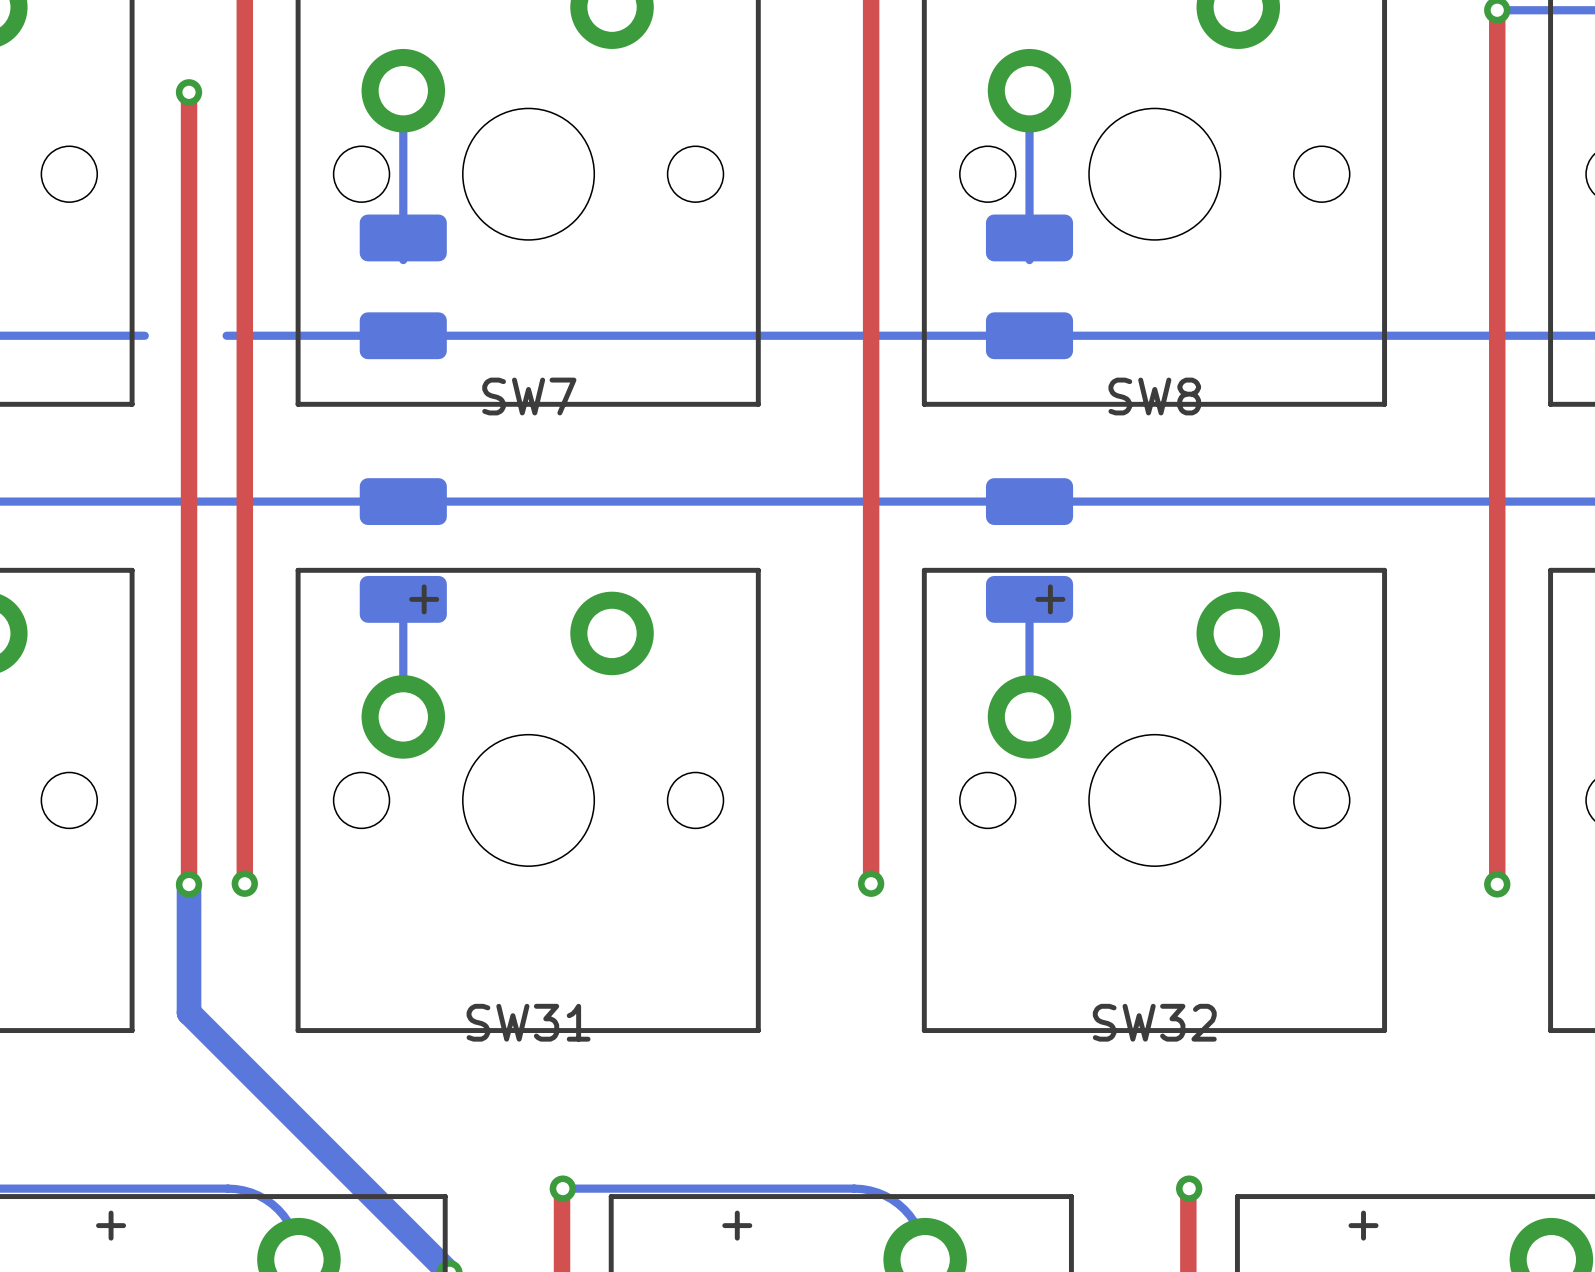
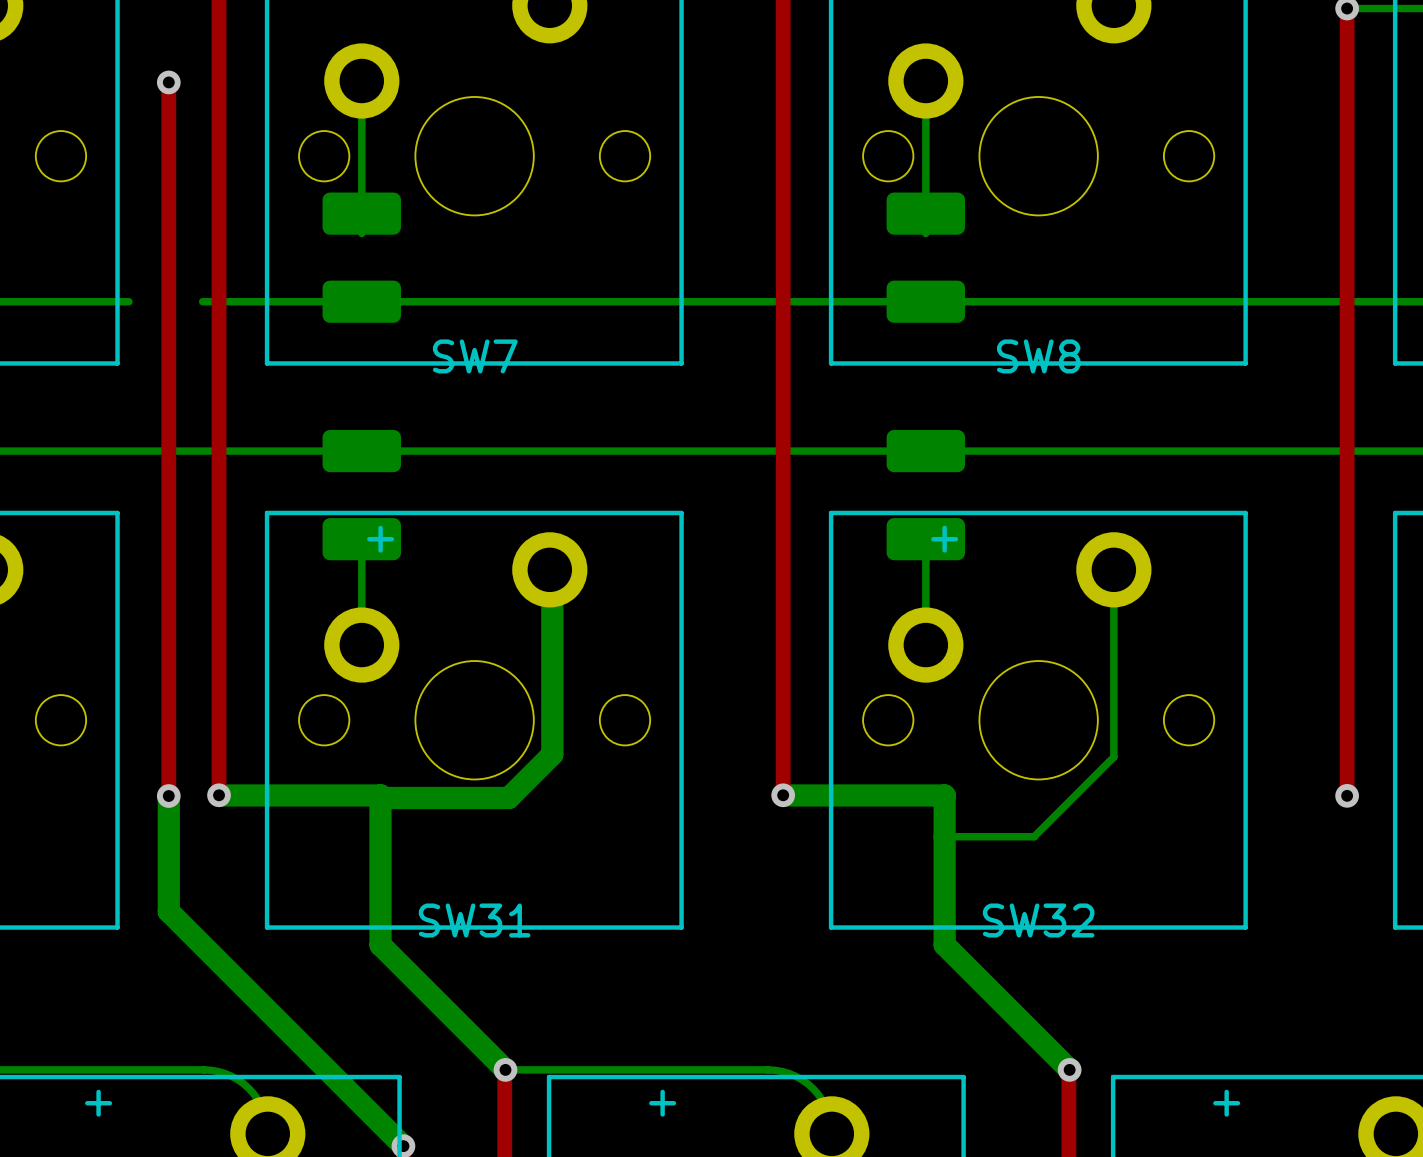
bottom track: none -> (1113, 569) (1113, 757) (1034, 836) (944, 836)
bottom track: none -> (552, 572) (552, 754) (508, 797) (383, 797) (380, 795)
bottom track: none -> (219, 795) (380, 795)
bottom track: none -> (380, 795) (380, 944) (505, 1069)
bottom track: none -> (783, 795) (944, 795) (944, 944) (1069, 1069)

